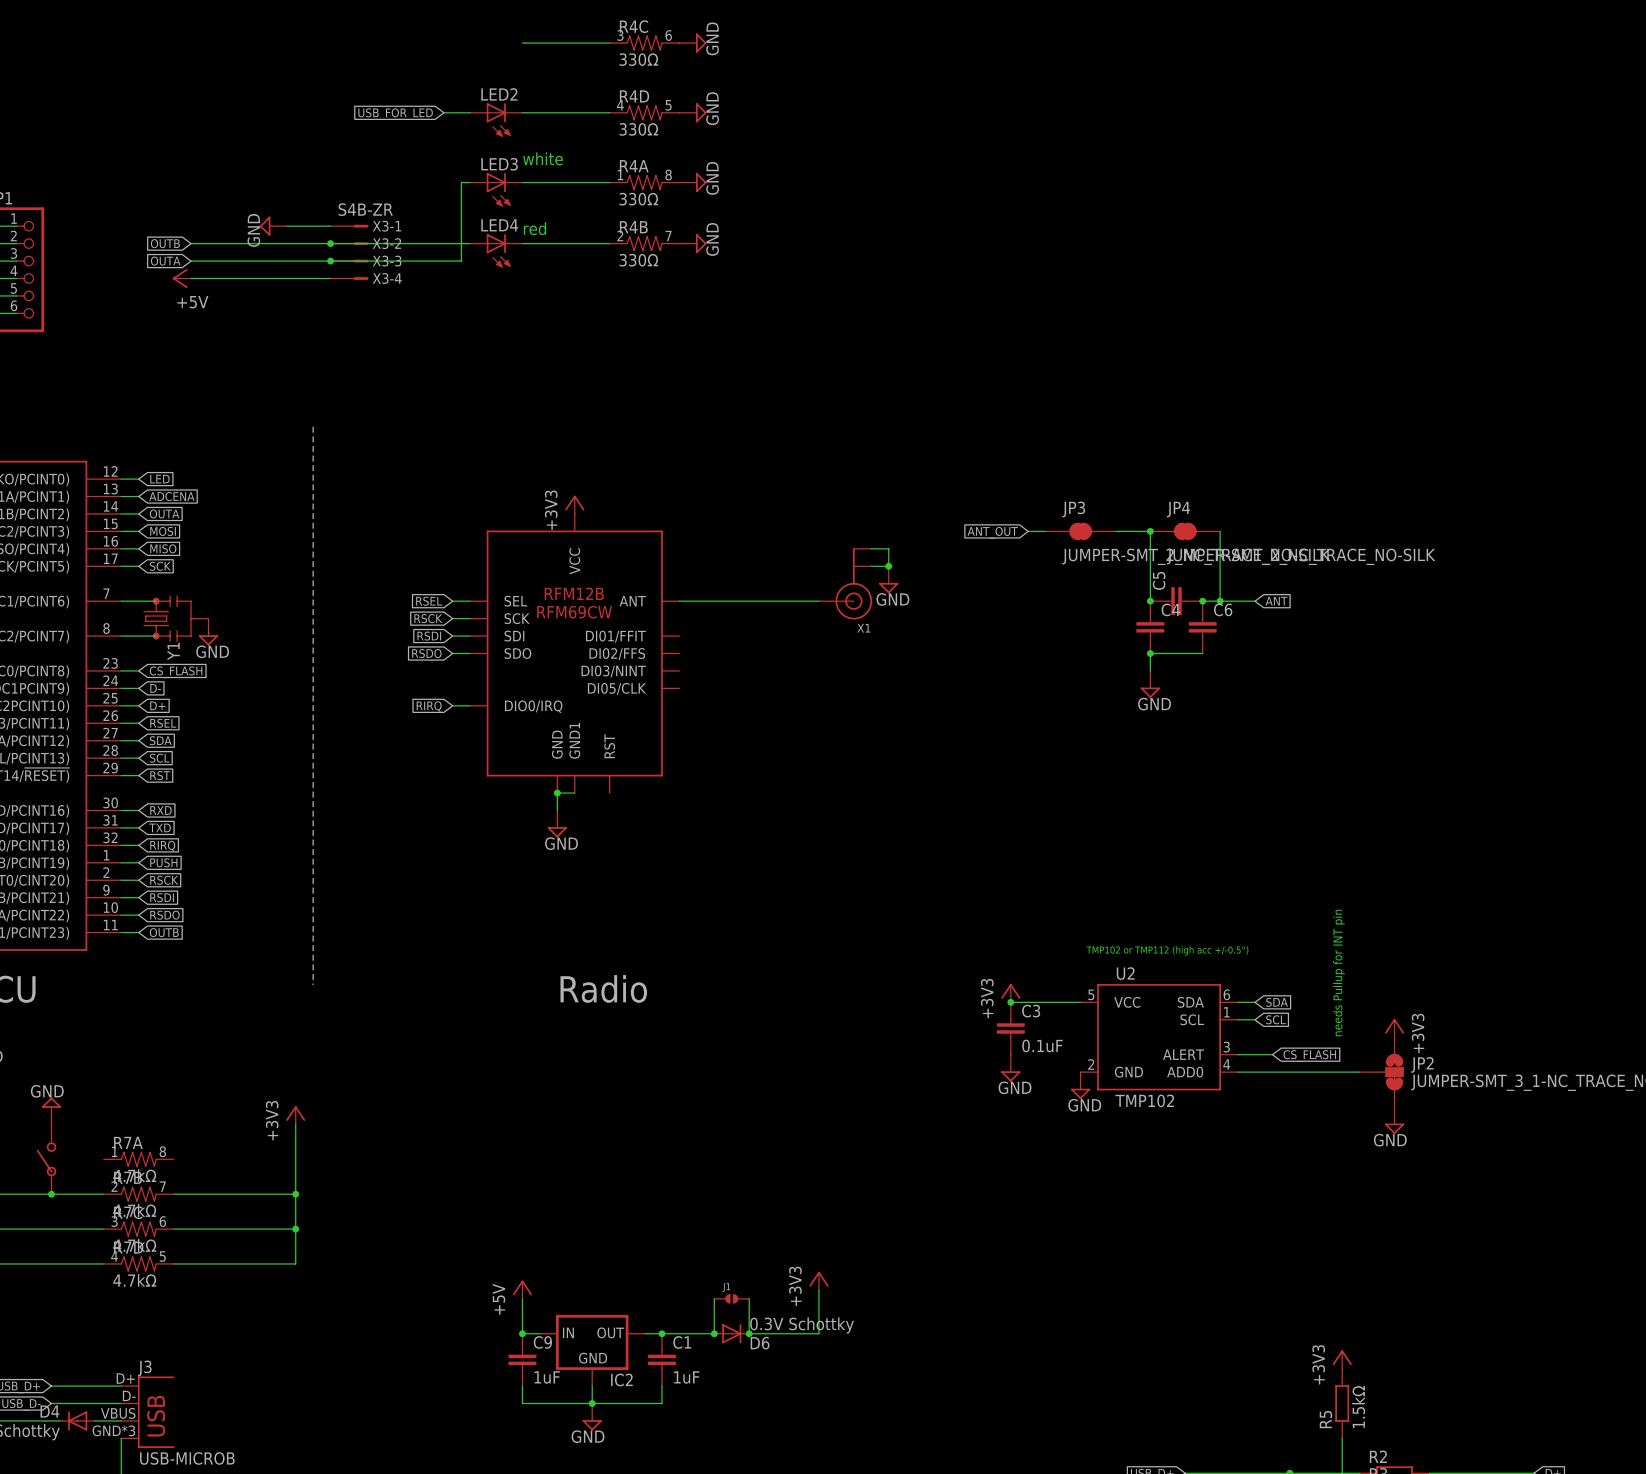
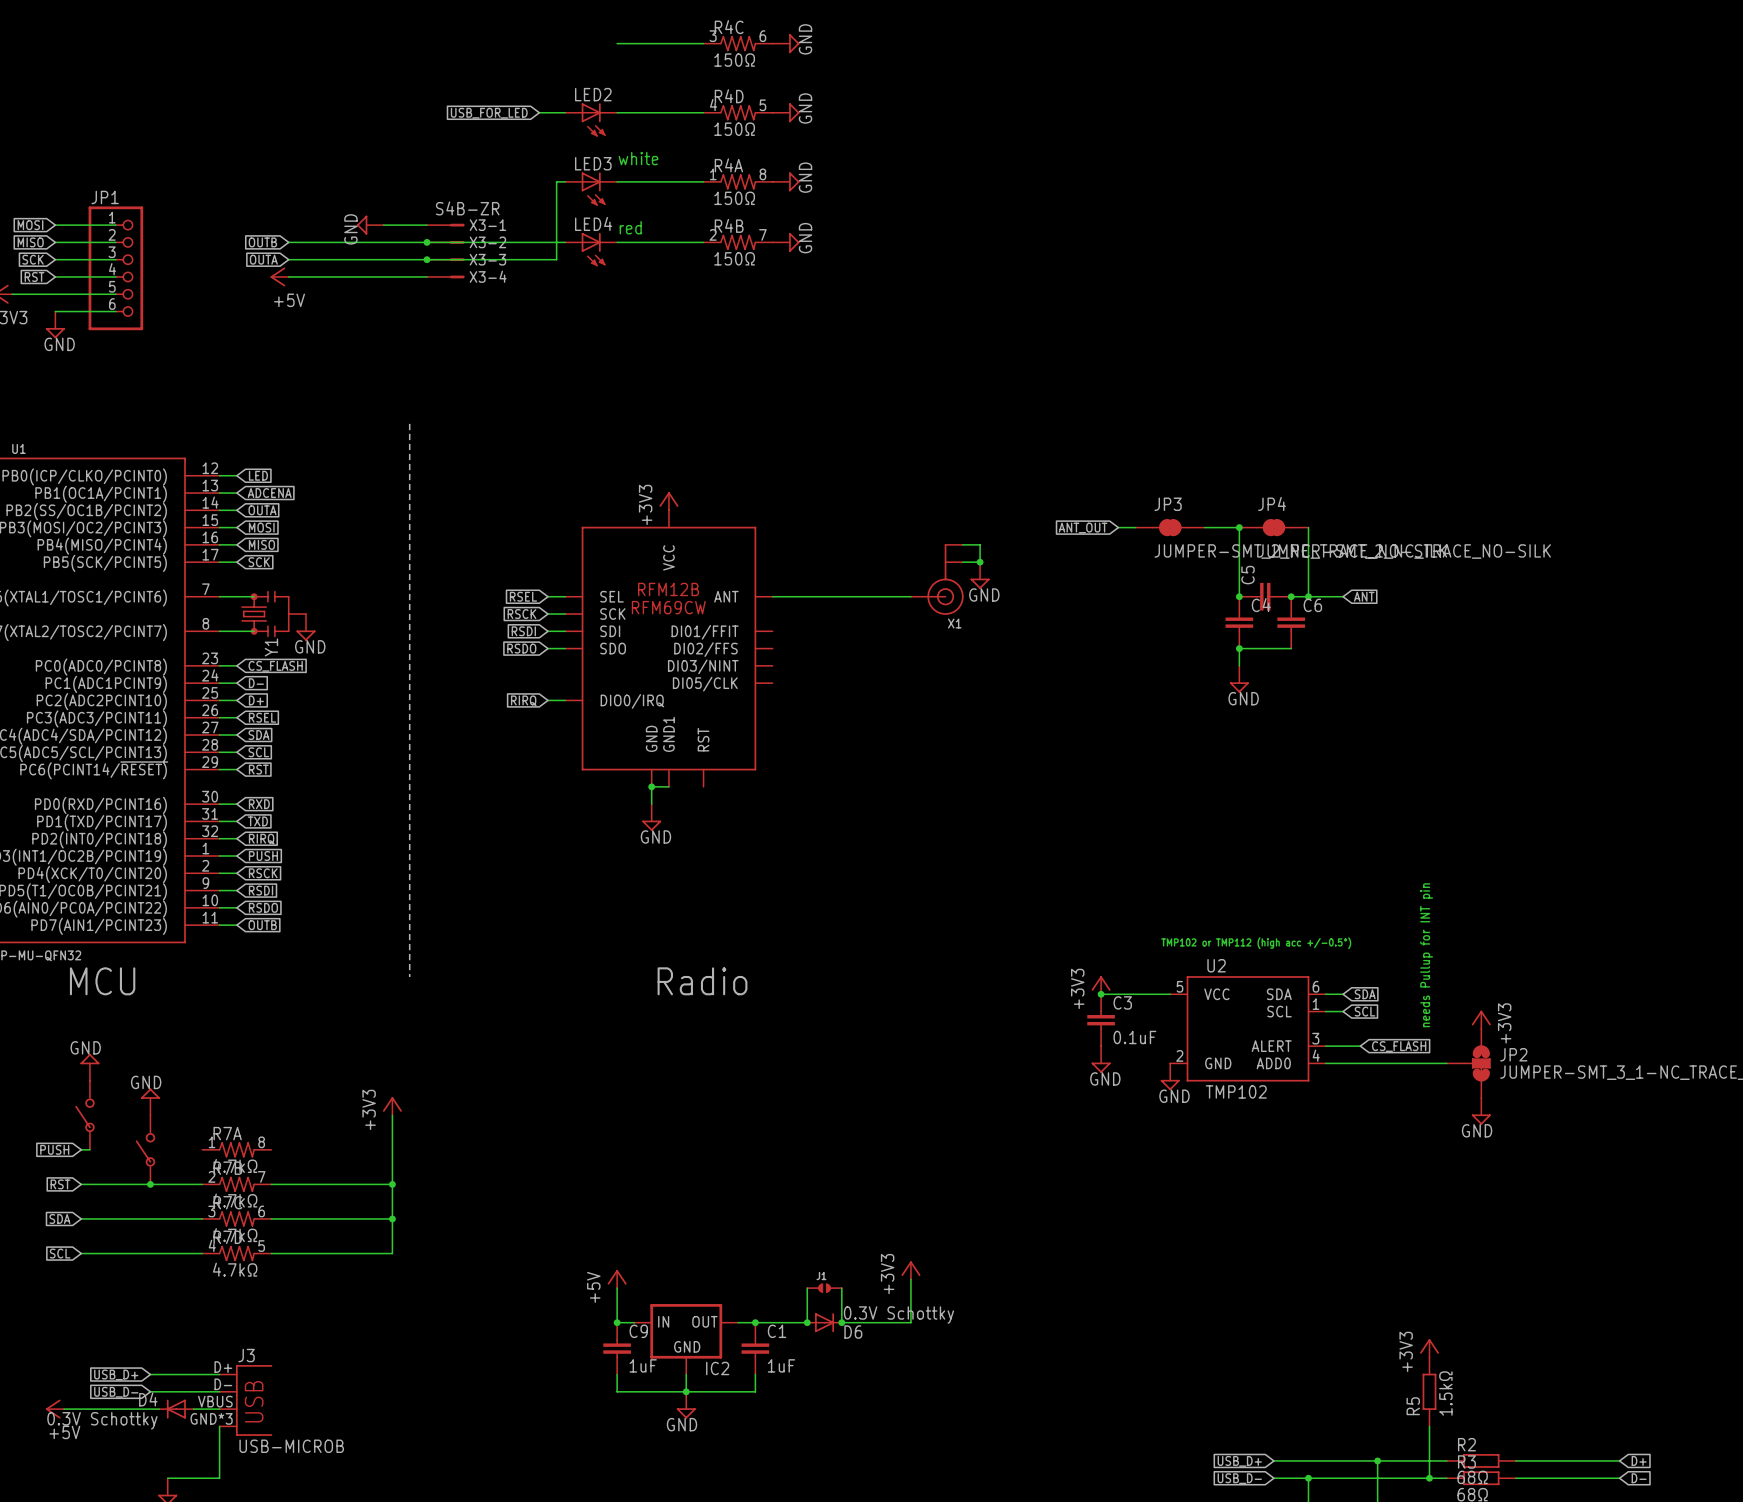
R4C value: 330Ω (638, 59) -> 150Ω (734, 60)
R4D value: 330Ω (638, 129) -> 150Ω (734, 129)
R4A value: 330Ω (638, 199) -> 150Ω (734, 198)
R4B value: 330Ω (638, 260) -> 150Ω (734, 258)

